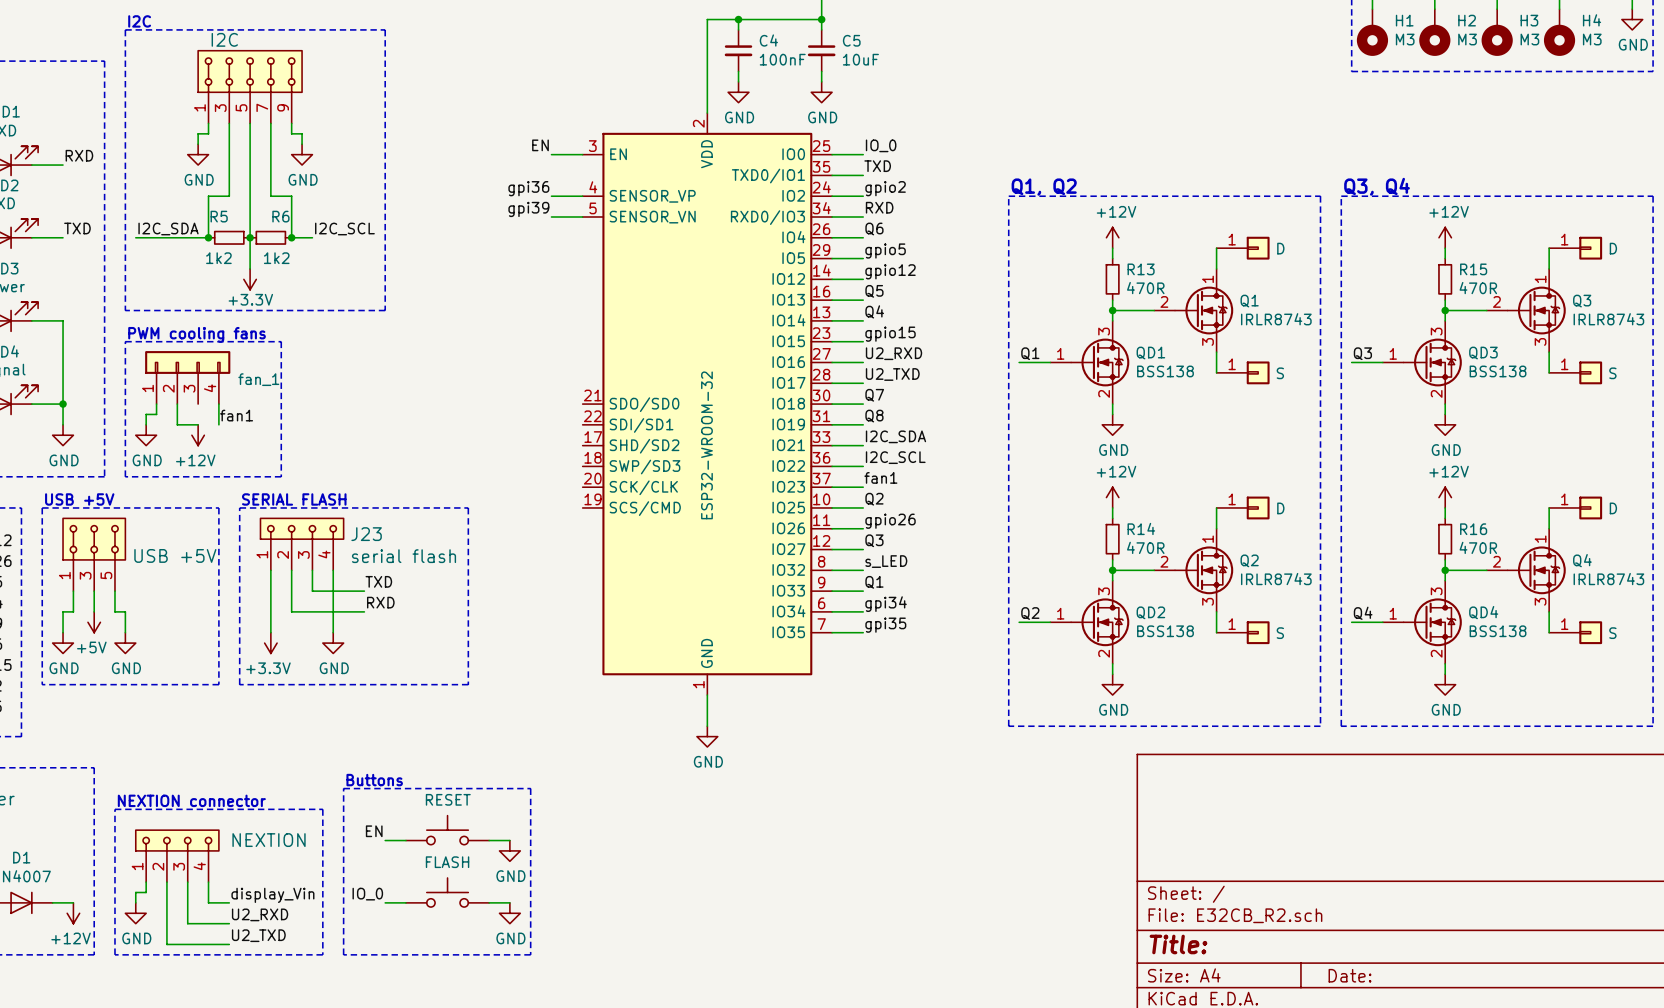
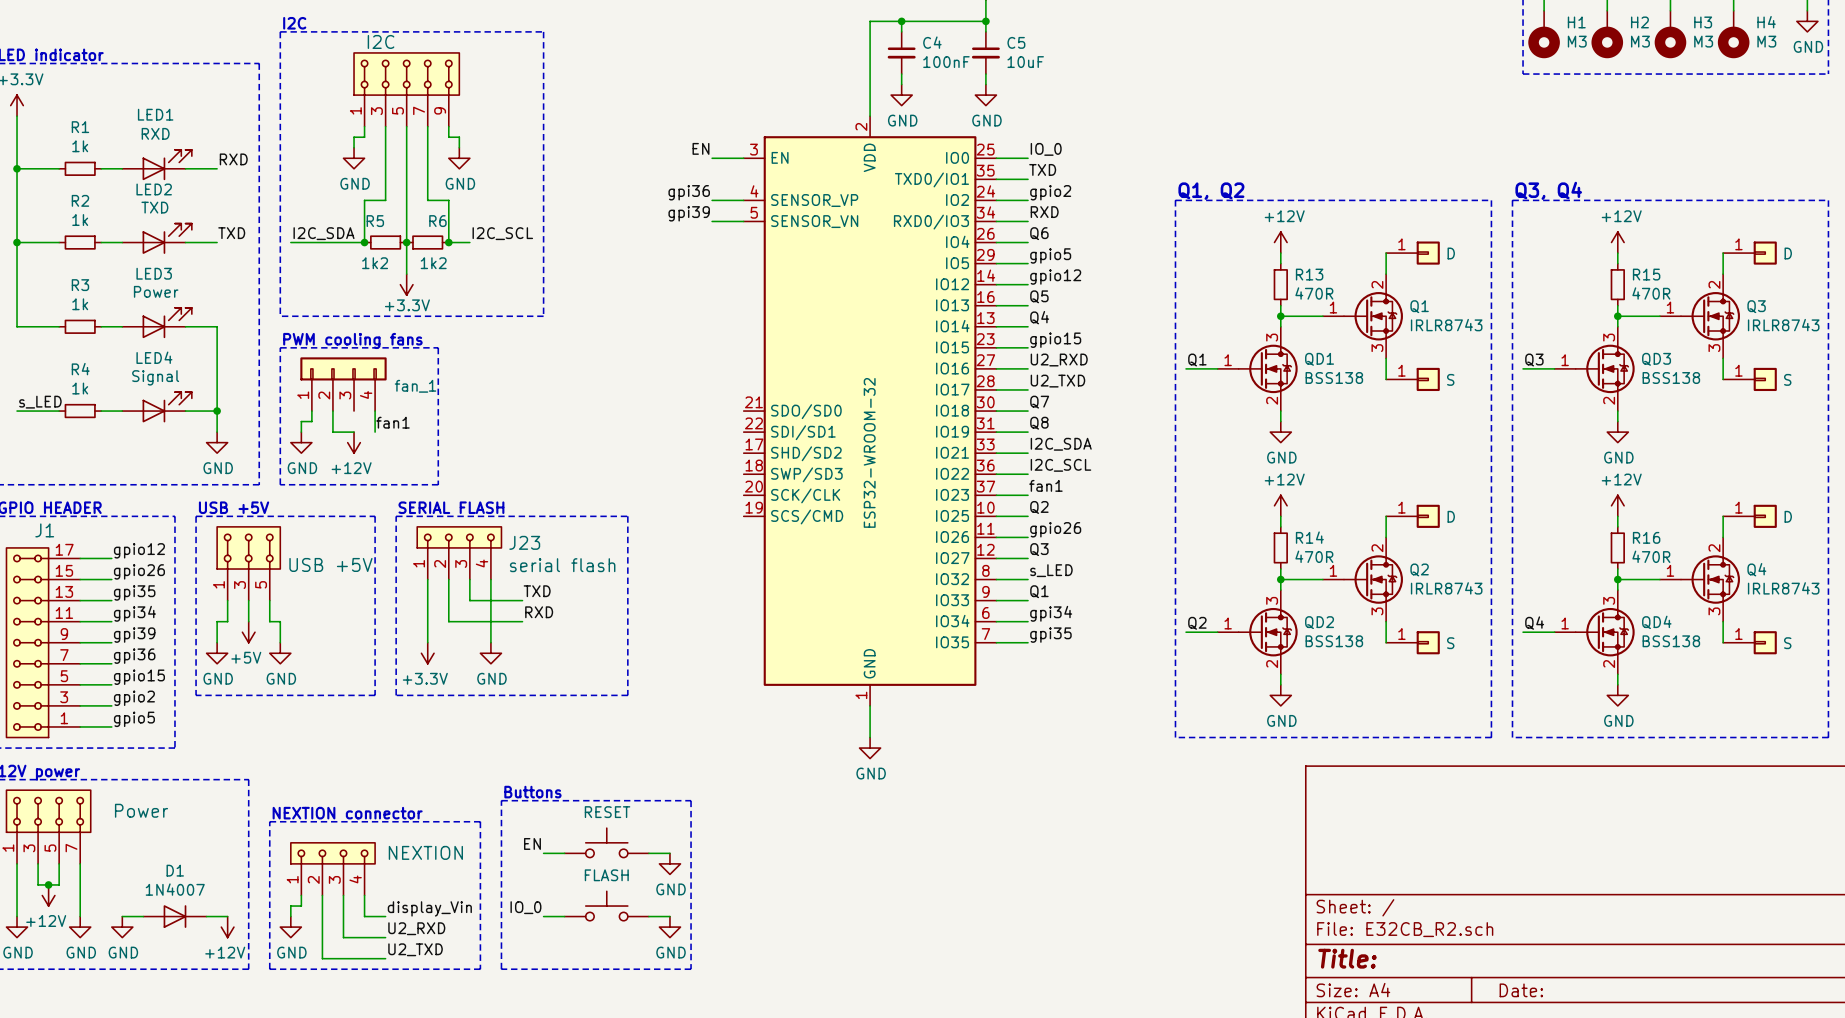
Q1 pin number: 1 (1208, 279) -> 2 (1377, 284)
Q3 pin number: 1 (1540, 279) -> 2 (1714, 284)
Q1 pin number: 2 (1164, 301) -> 1 (1333, 307)
Q3 pin number: 2 (1496, 301) -> 1 (1670, 307)
Q2 pin number: 1 (1208, 539) -> 2 (1377, 548)
Q4 pin number: 1 (1540, 539) -> 2 (1714, 548)
Q2 pin number: 2 (1164, 561) -> 1 (1333, 570)
Q4 pin number: 2 (1496, 561) -> 1 (1670, 570)

